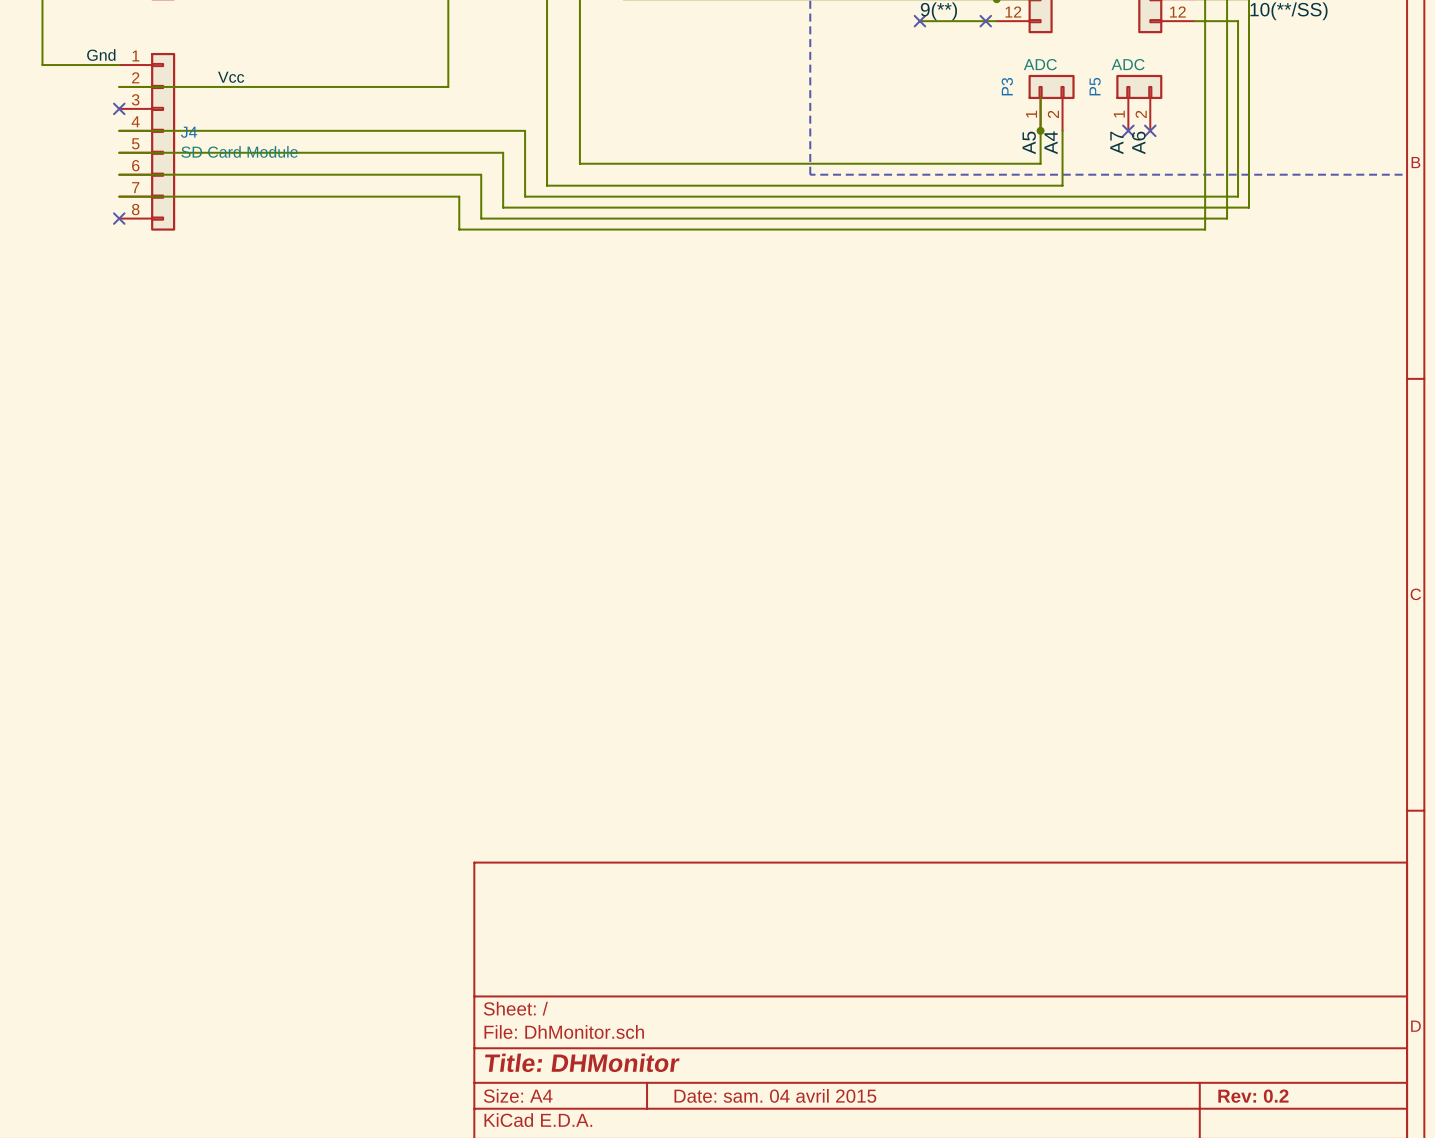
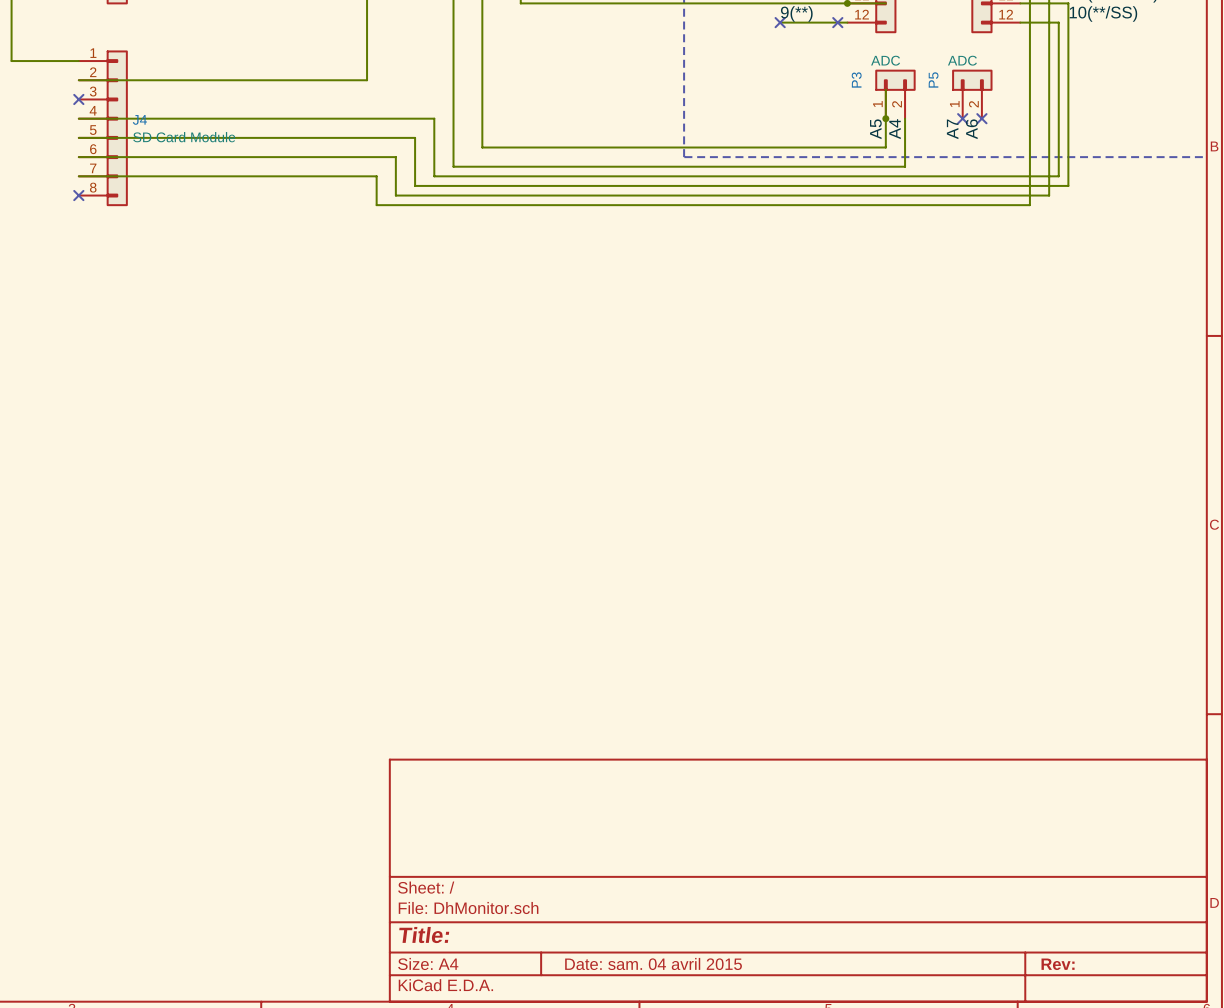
label: Gnd (101, 55) -> none
label: Vcc (231, 77) -> none
title block: Title: DHMonitor (582, 1062) -> Title: (424, 935)
title block: Rev: 0.2 (1253, 1096) -> Rev: (1058, 964)

